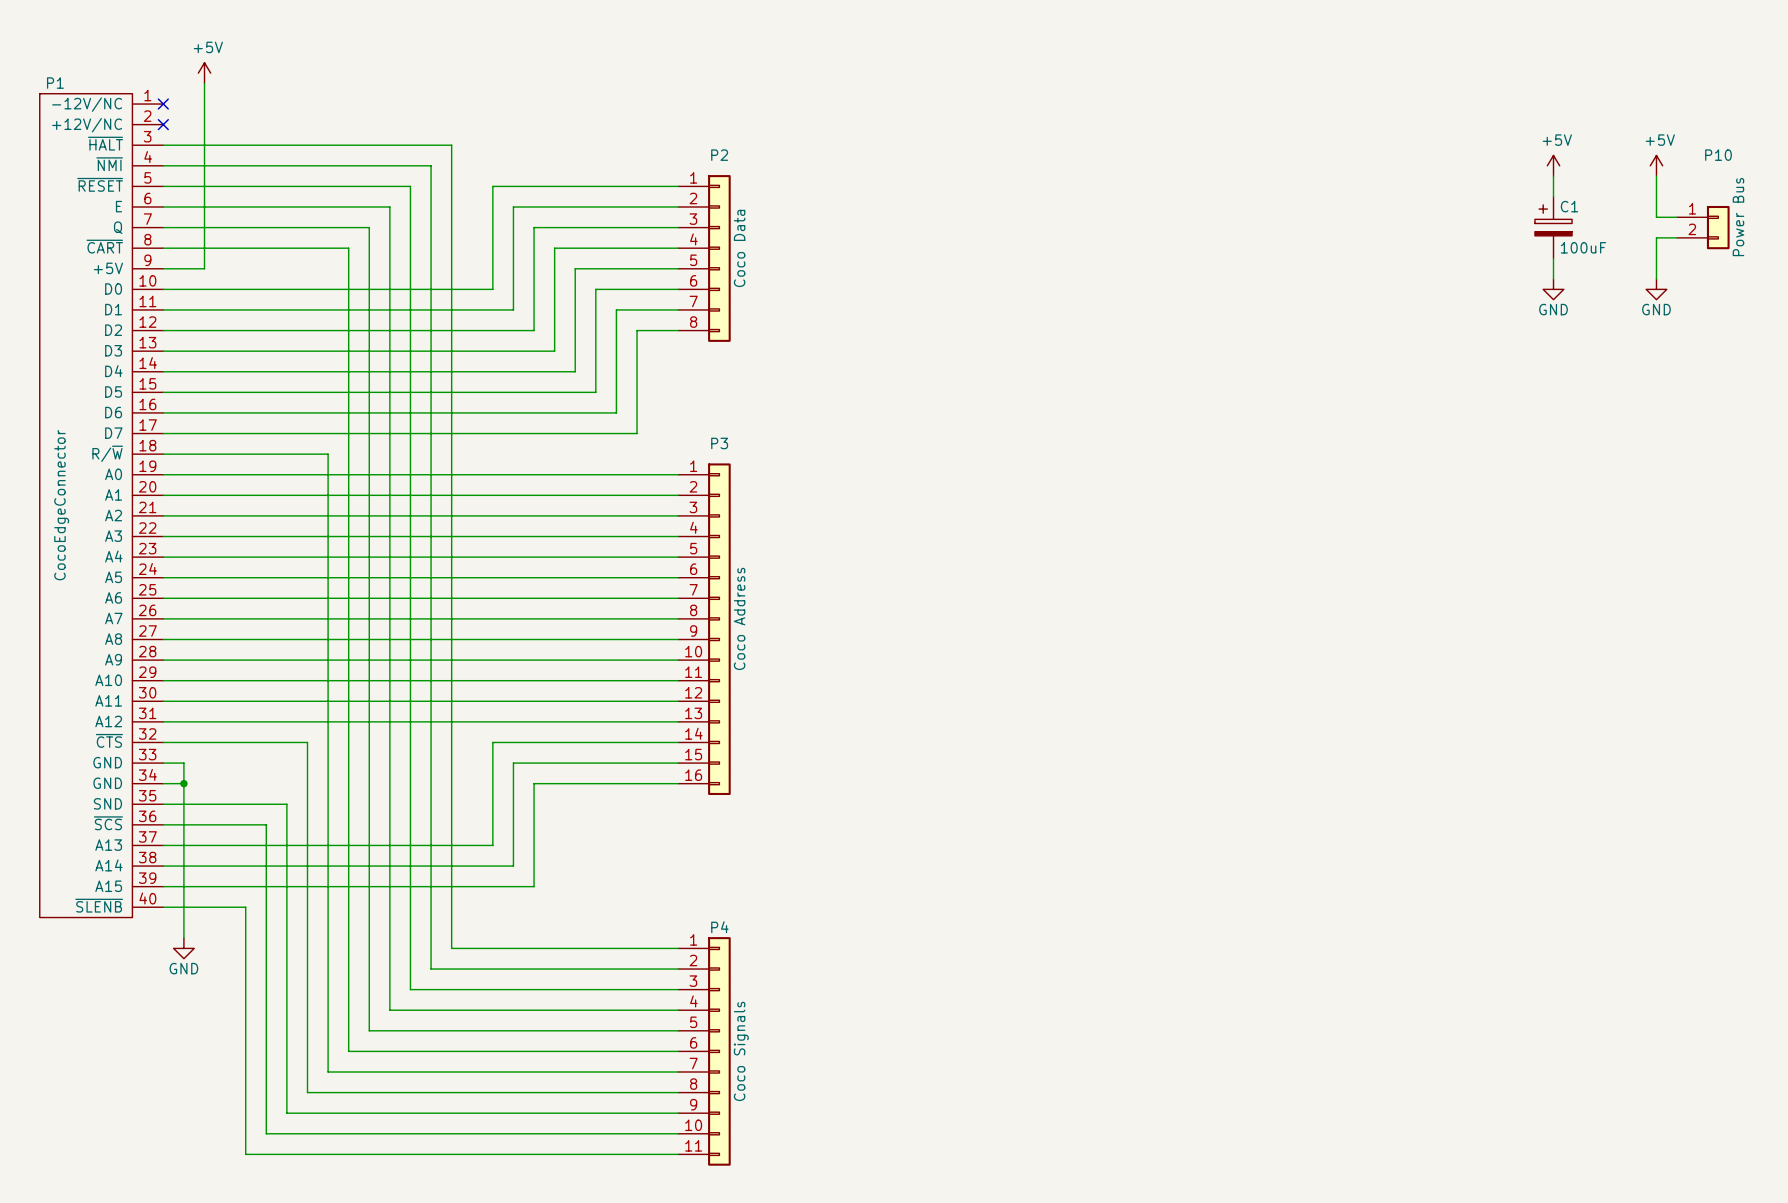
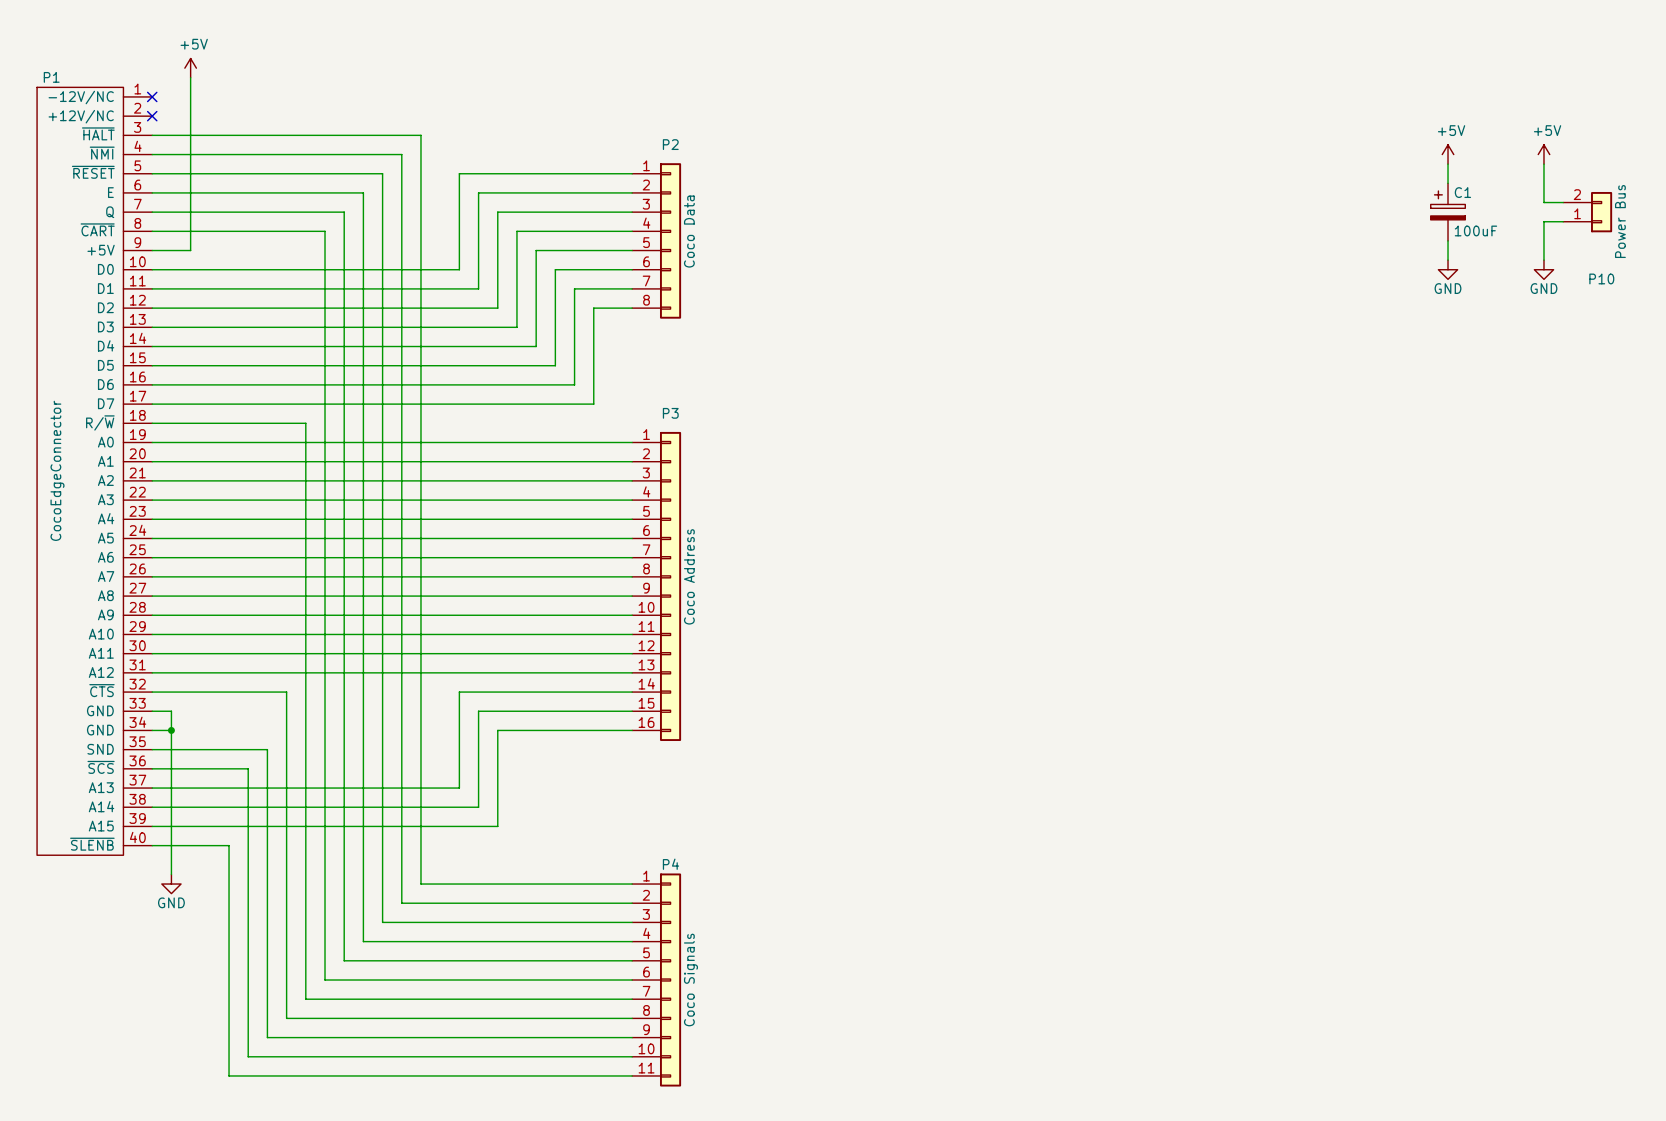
P10 flip: as is (1718, 227) -> up-down (1601, 212)

